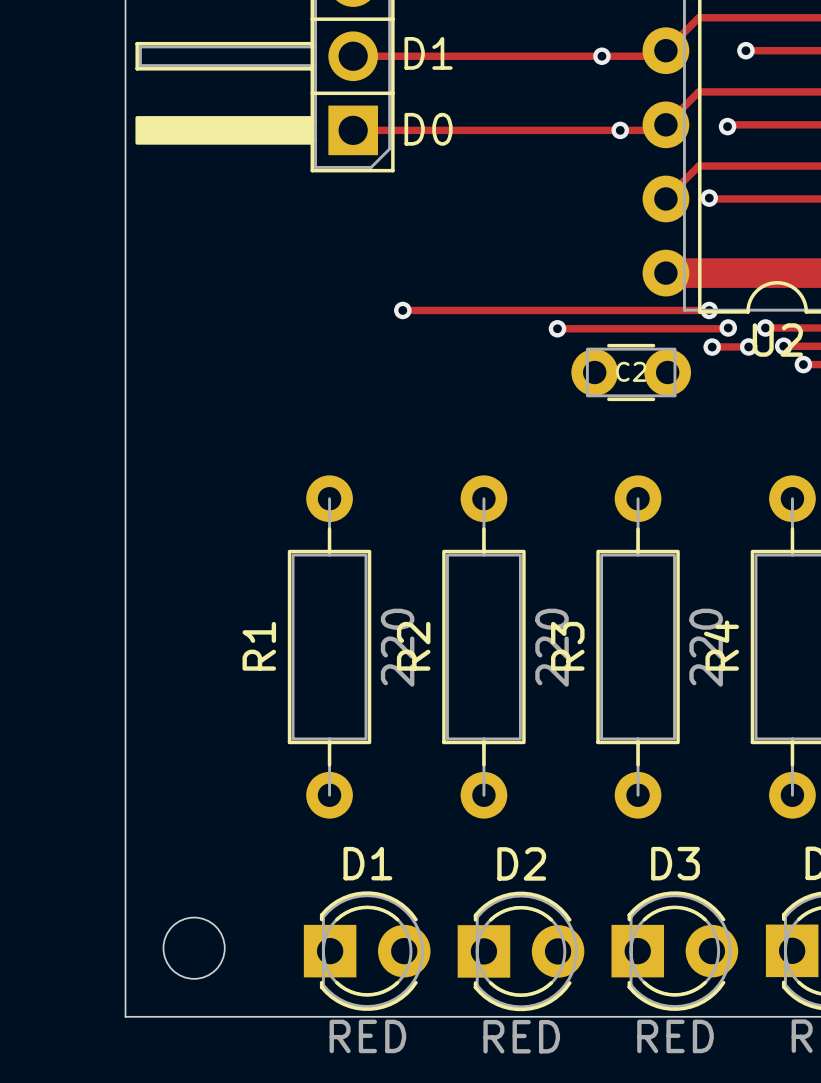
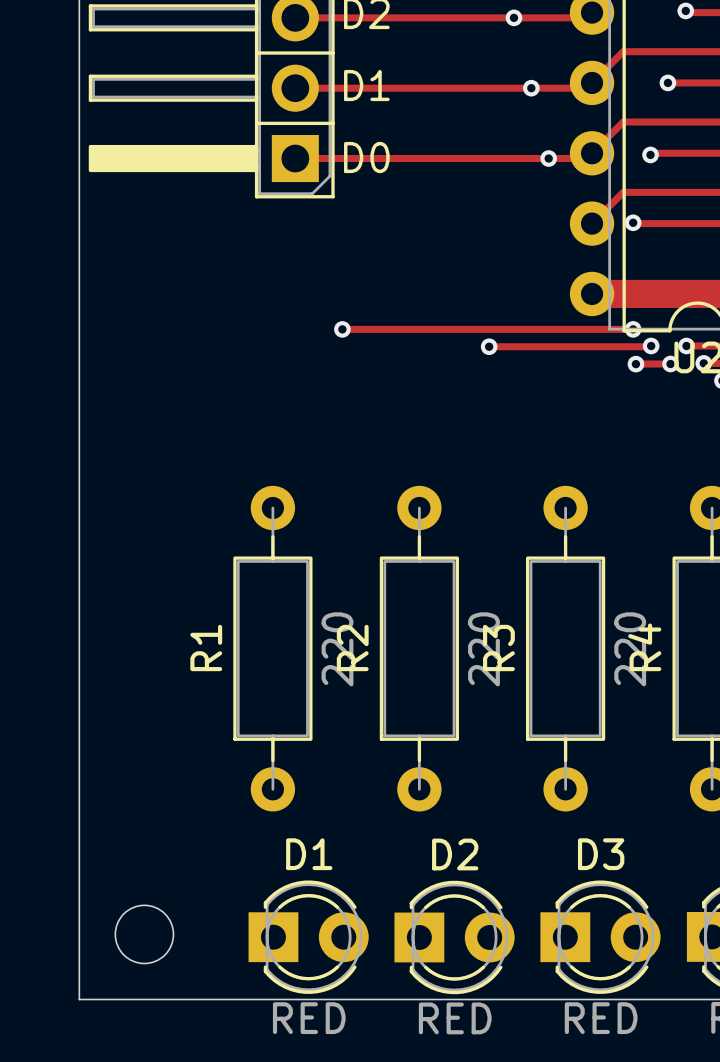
C2: (631, 372) -> none

